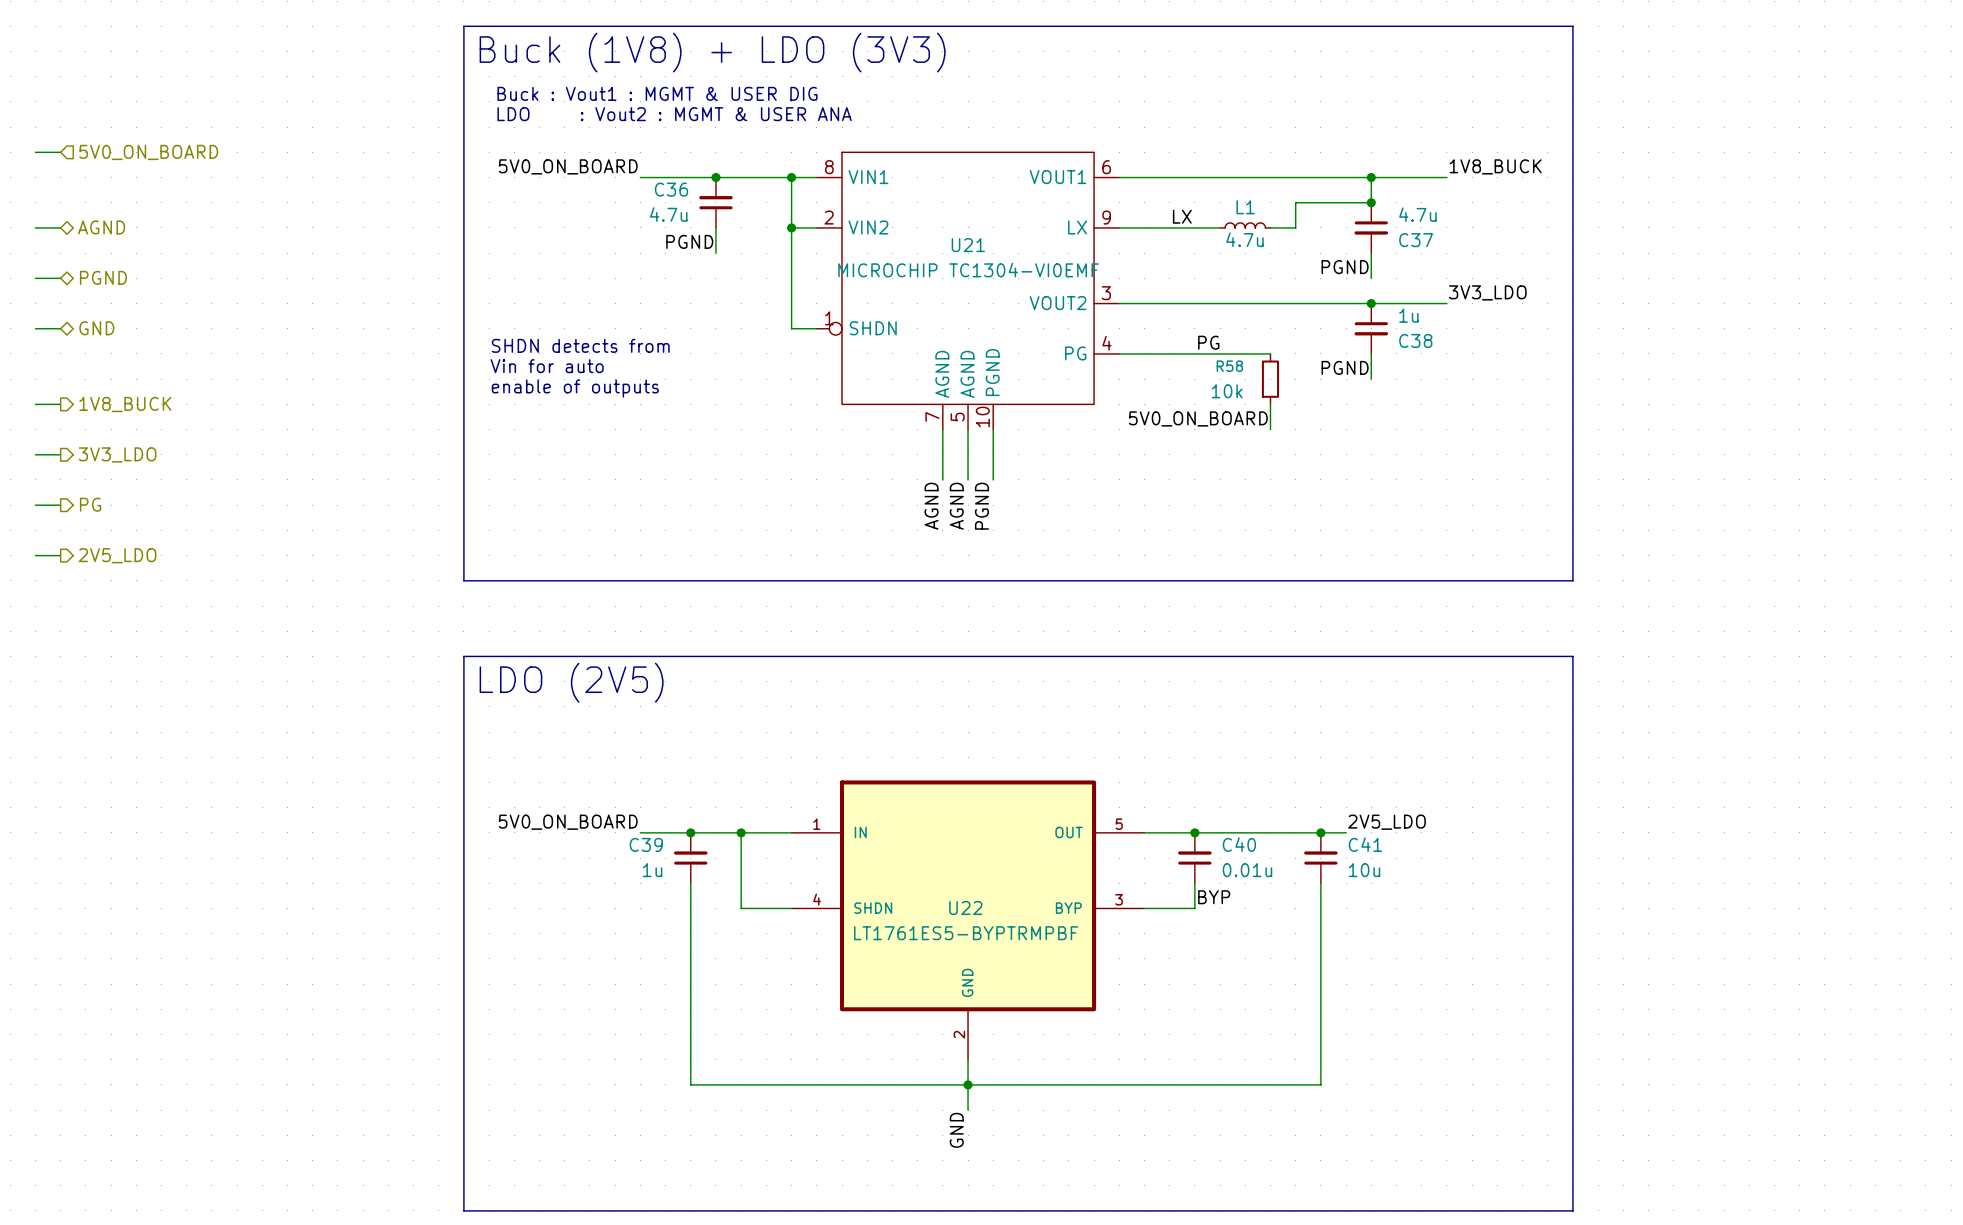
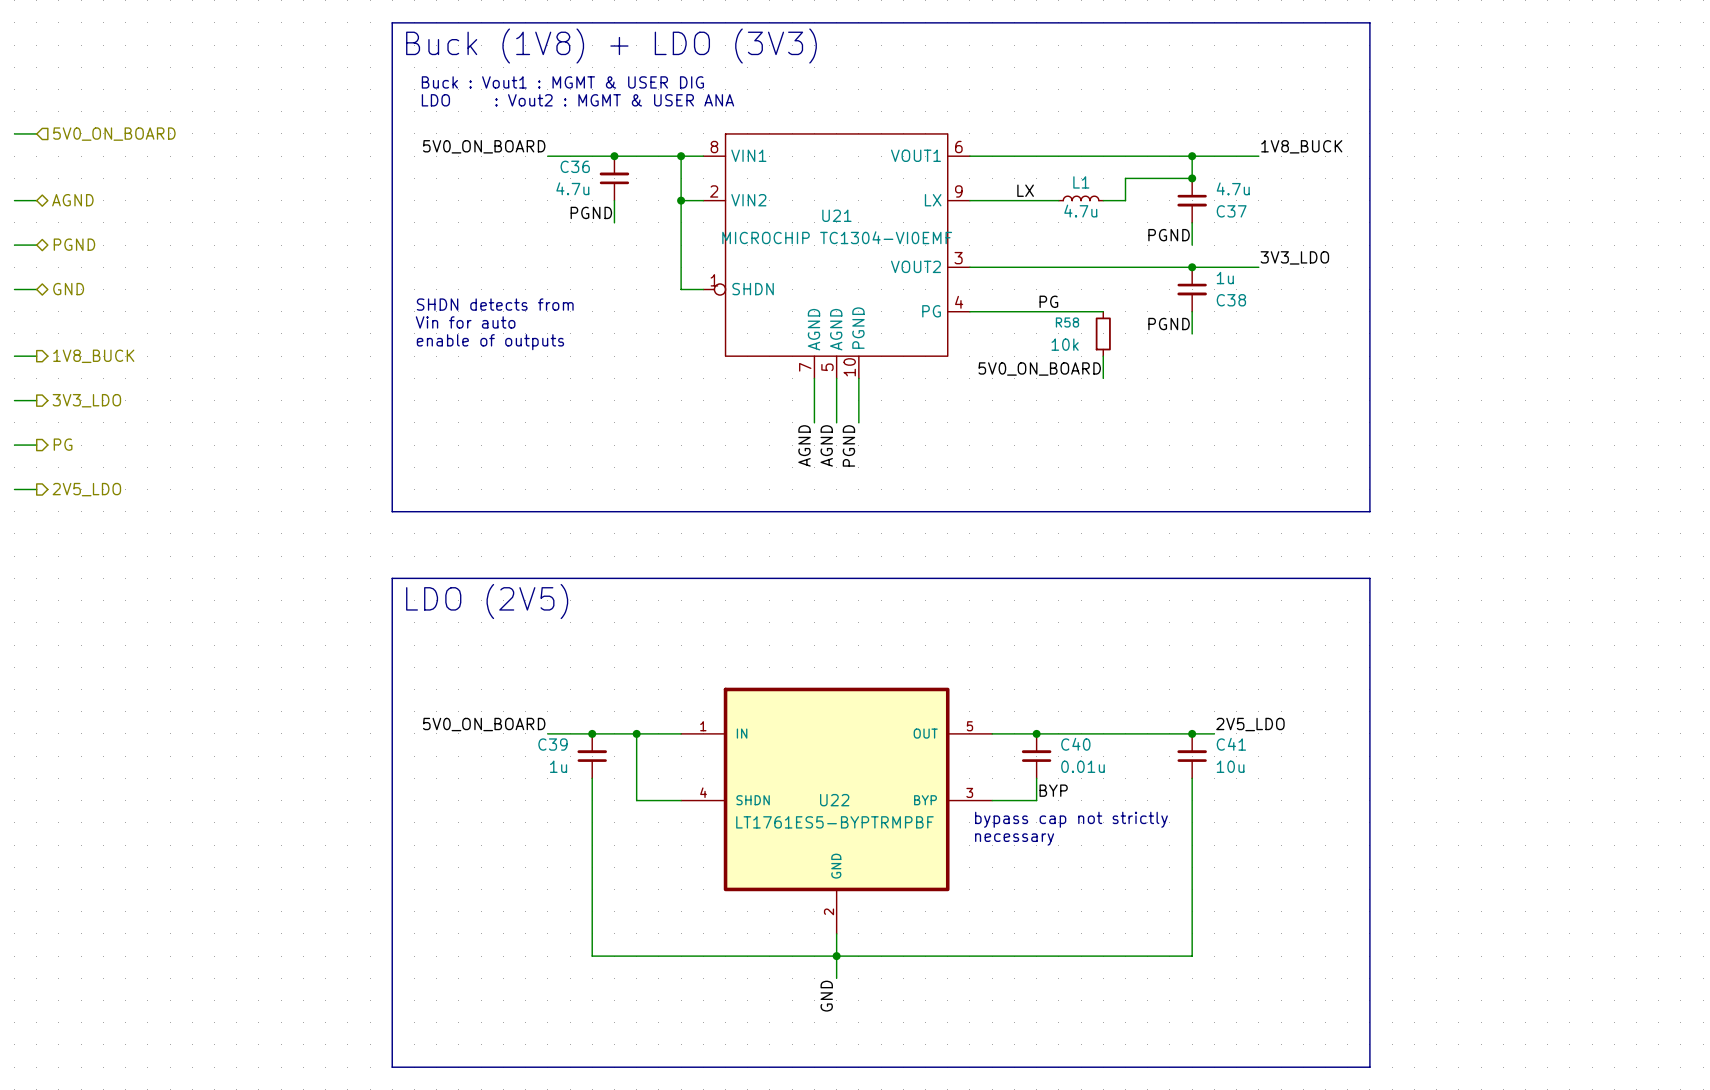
label position: 2V5_LDO (1387, 822) -> 2V5_LDO (1250, 724)
junction position: (1320, 832) -> (1192, 733)
wire: none -> (1169, 733) (1214, 733)
C41 position: (1320, 858) -> (1192, 756)
wire: (1320, 883) (1320, 1084) -> (1192, 778) (1192, 956) (1147, 956)
text: none -> bypass cap not strictly (1071, 819)
text: none -> necessary (1014, 839)

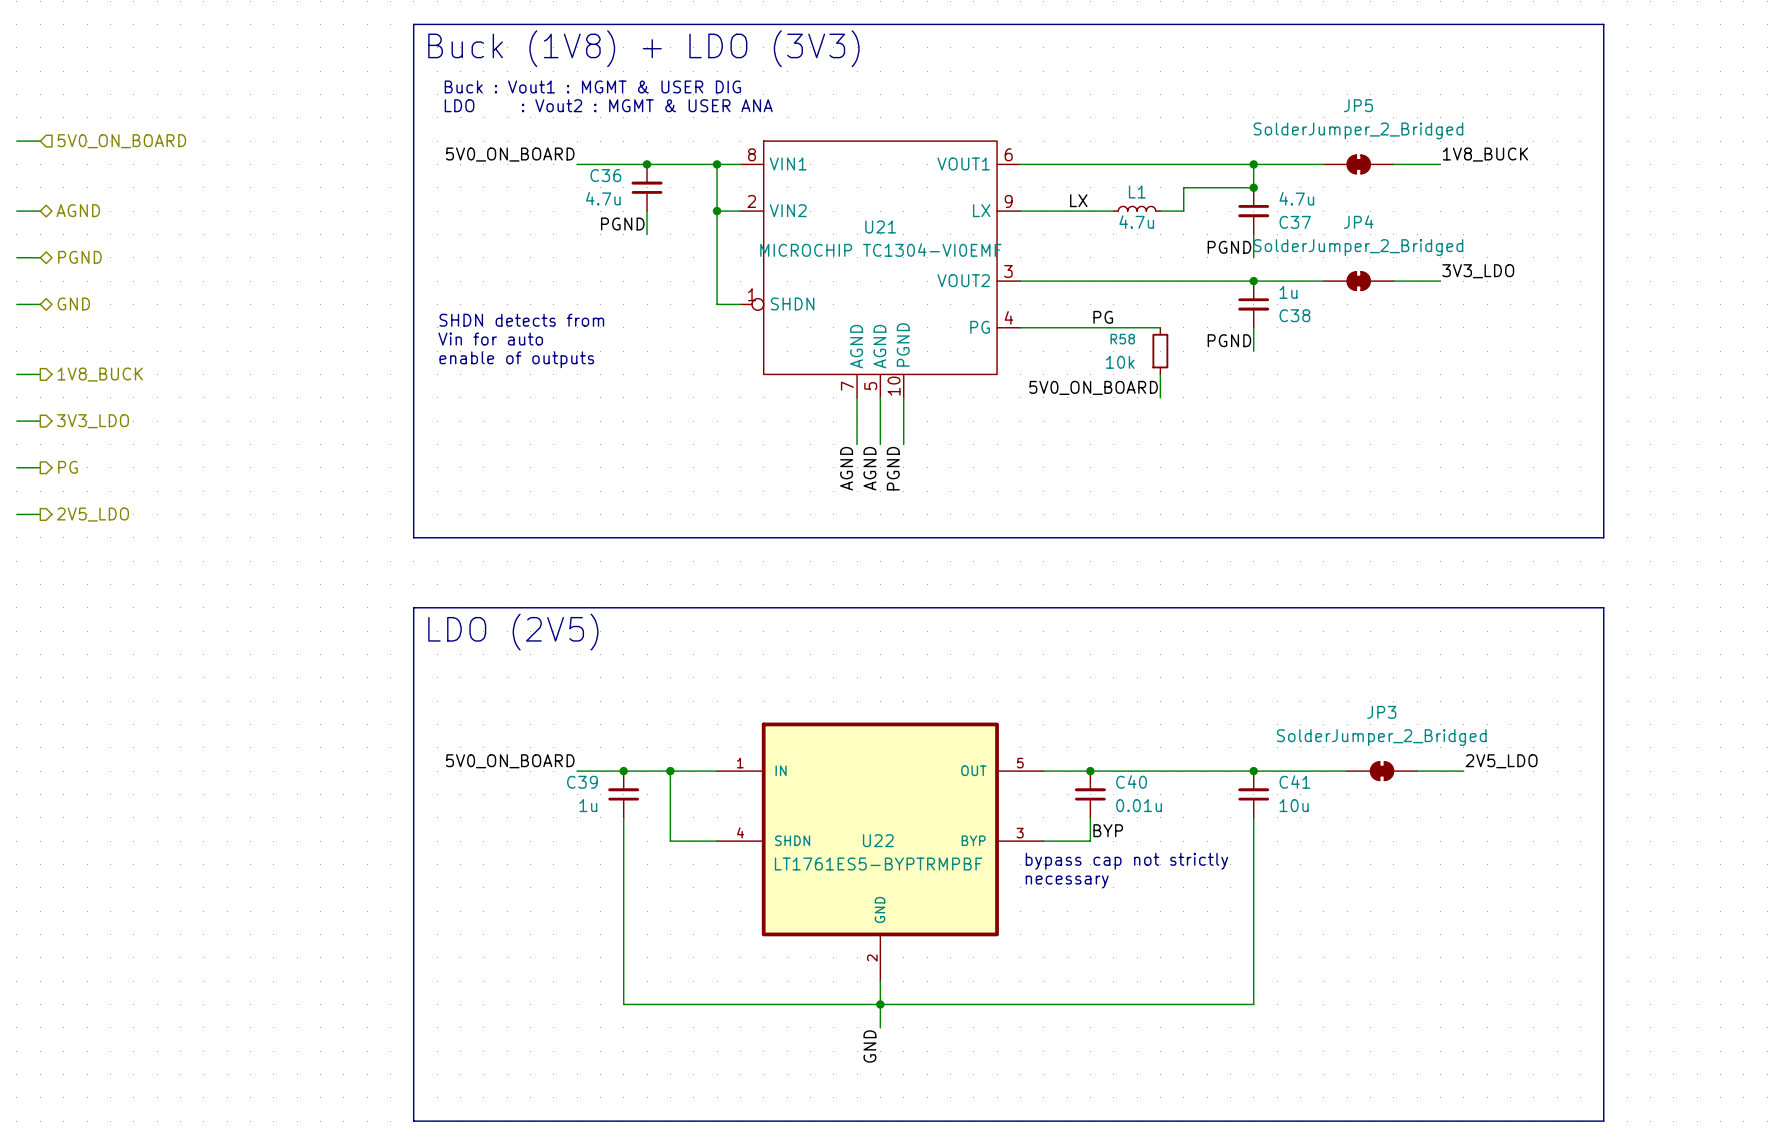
line: (1369, 22) (1369, 511) -> (1440, 24) (1603, 24) (1603, 537) (1440, 537)
label position: 1V8_BUCK (1301, 146) -> 1V8_BUCK (1485, 154)
JP5: none -> SolderJumper_2_Bridged (1358, 164)
wire: none -> (1393, 164) (1440, 164)
label position: 3V3_LDO (1294, 257) -> 3V3_LDO (1478, 271)
JP4: none -> SolderJumper_2_Bridged (1358, 281)
wire: none -> (1393, 281) (1440, 281)
line: (1369, 578) (1369, 1067) -> (1440, 607) (1603, 607) (1603, 1121) (1440, 1121)
label position: 2V5_LDO (1250, 724) -> 2V5_LDO (1501, 761)
wire: none -> (1277, 771) (1347, 771)
JP3: none -> SolderJumper_2_Bridged (1382, 771)
wire: none -> (1417, 771) (1463, 771)

